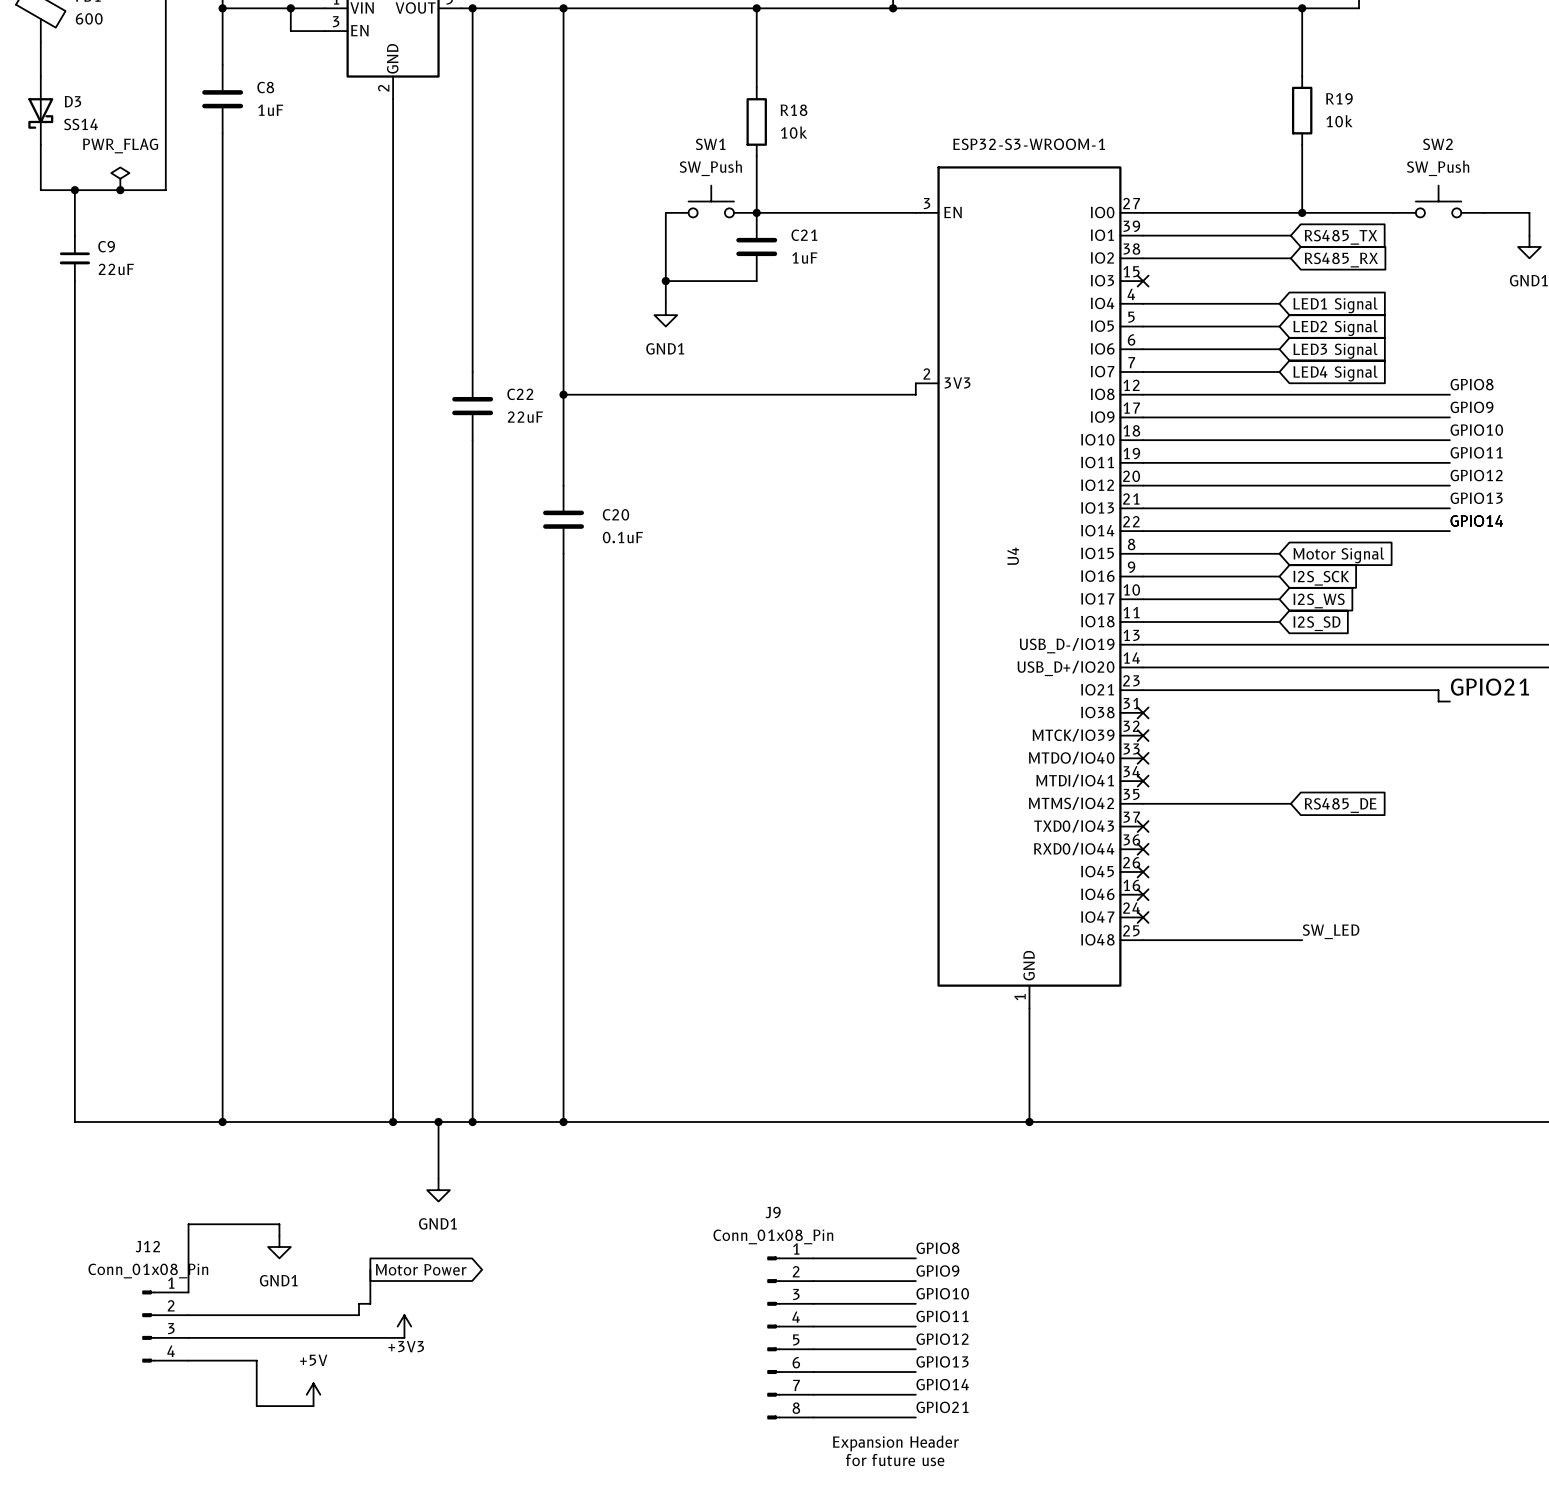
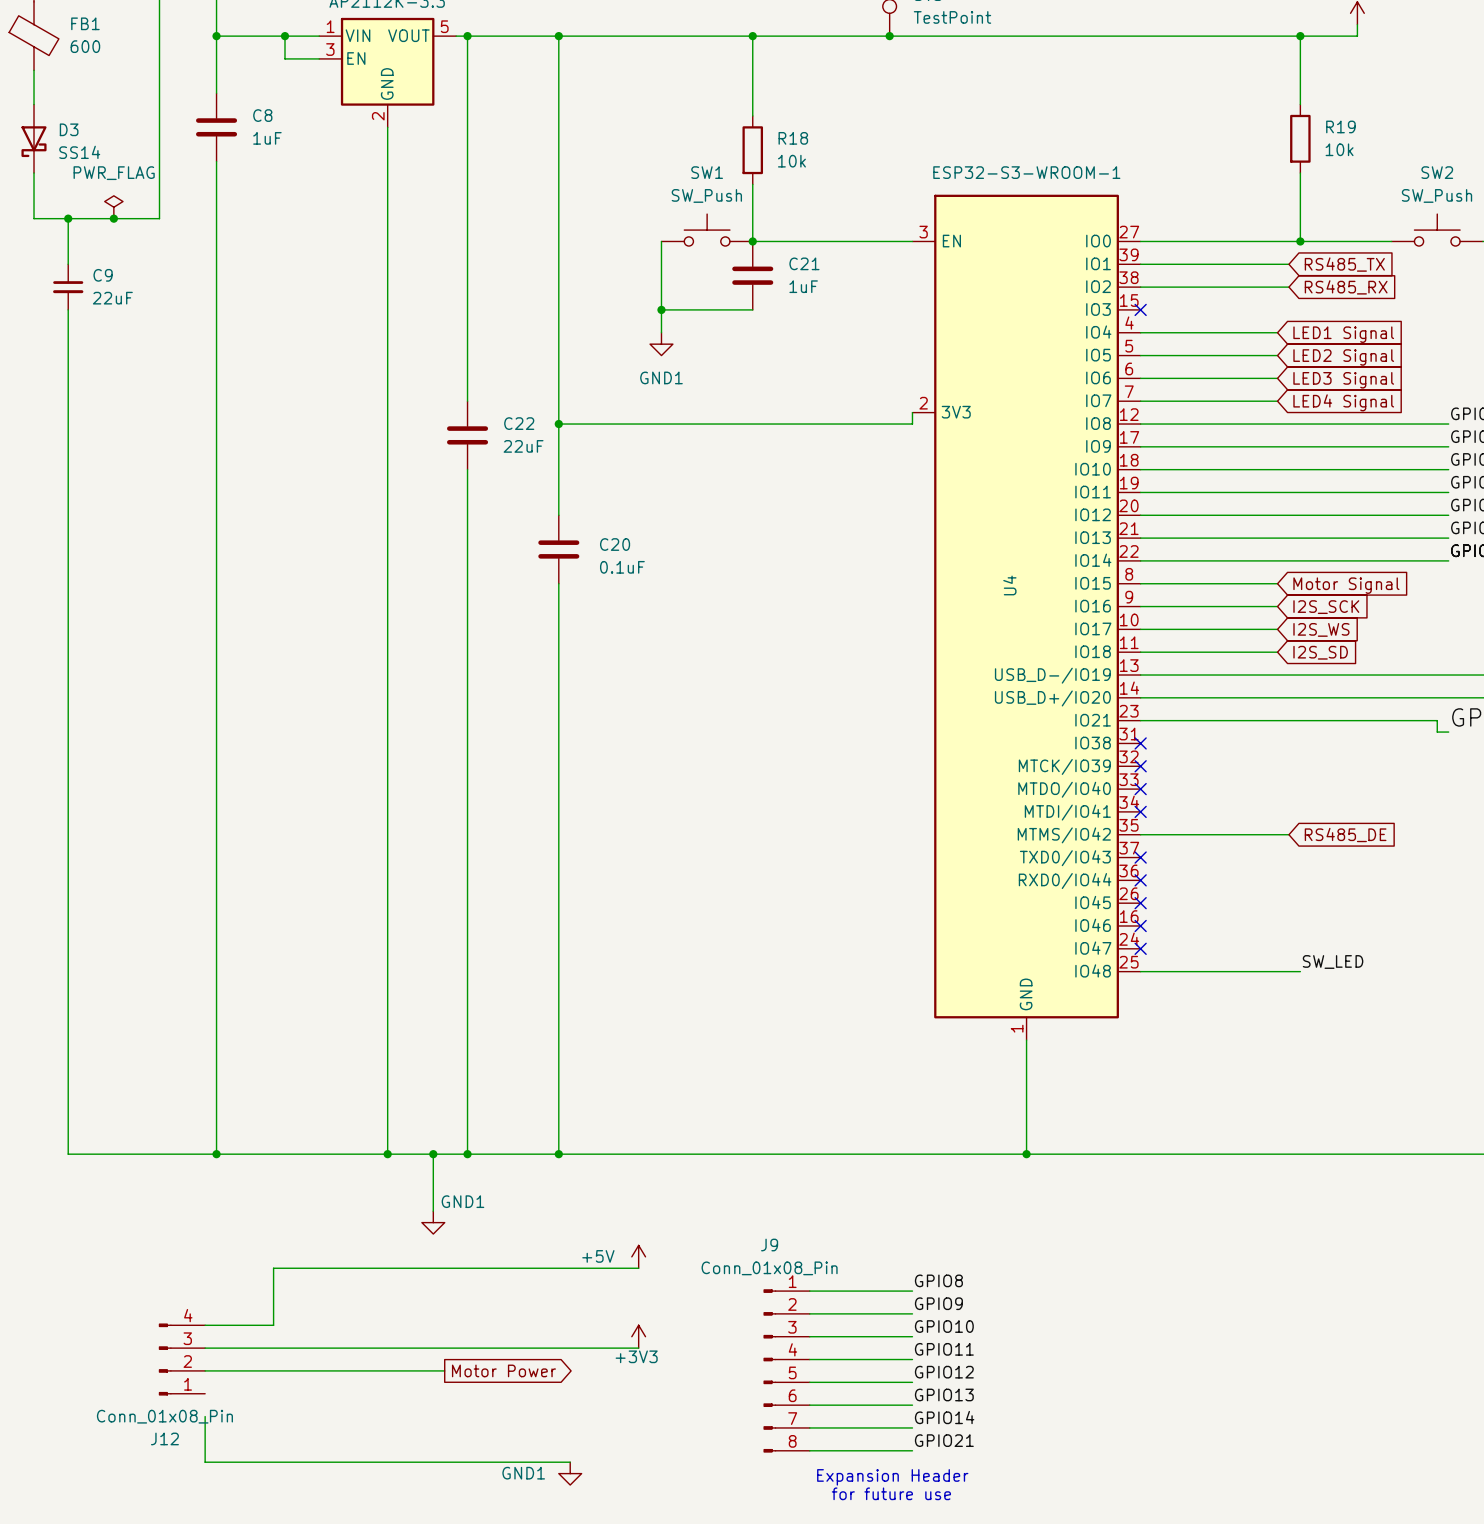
power symbol text position: GND1 (437, 1223) -> GND1 (462, 1201)
power symbol: none -> +5V (638, 1256)
wire: (279, 1235) (279, 1224) (188, 1224) (188, 1292) -> none
wire: none -> (638, 1268) (273, 1268) (273, 1325) (205, 1325)
power symbol: GND1 (279, 1247) -> none
wire: (370, 1269) (370, 1303) (358, 1303) (358, 1315) -> (638, 1348) (353, 1348)
global label position: Motor Power (421, 1269) -> Motor Power (503, 1370)
power symbol: none -> +3V3 (638, 1336)
J12 flip: as is (148, 1326) -> up-down (165, 1359)
power symbol: +3V3 (404, 1326) -> none
wire: none -> (399, 1370) (444, 1370)
wire: (188, 1360) (256, 1360) (256, 1406) (313, 1406) -> none
wire: none -> (205, 1416) (205, 1462) (570, 1462)
power symbol: +5V (313, 1394) -> none
power symbol: none -> GND1 (570, 1473)

